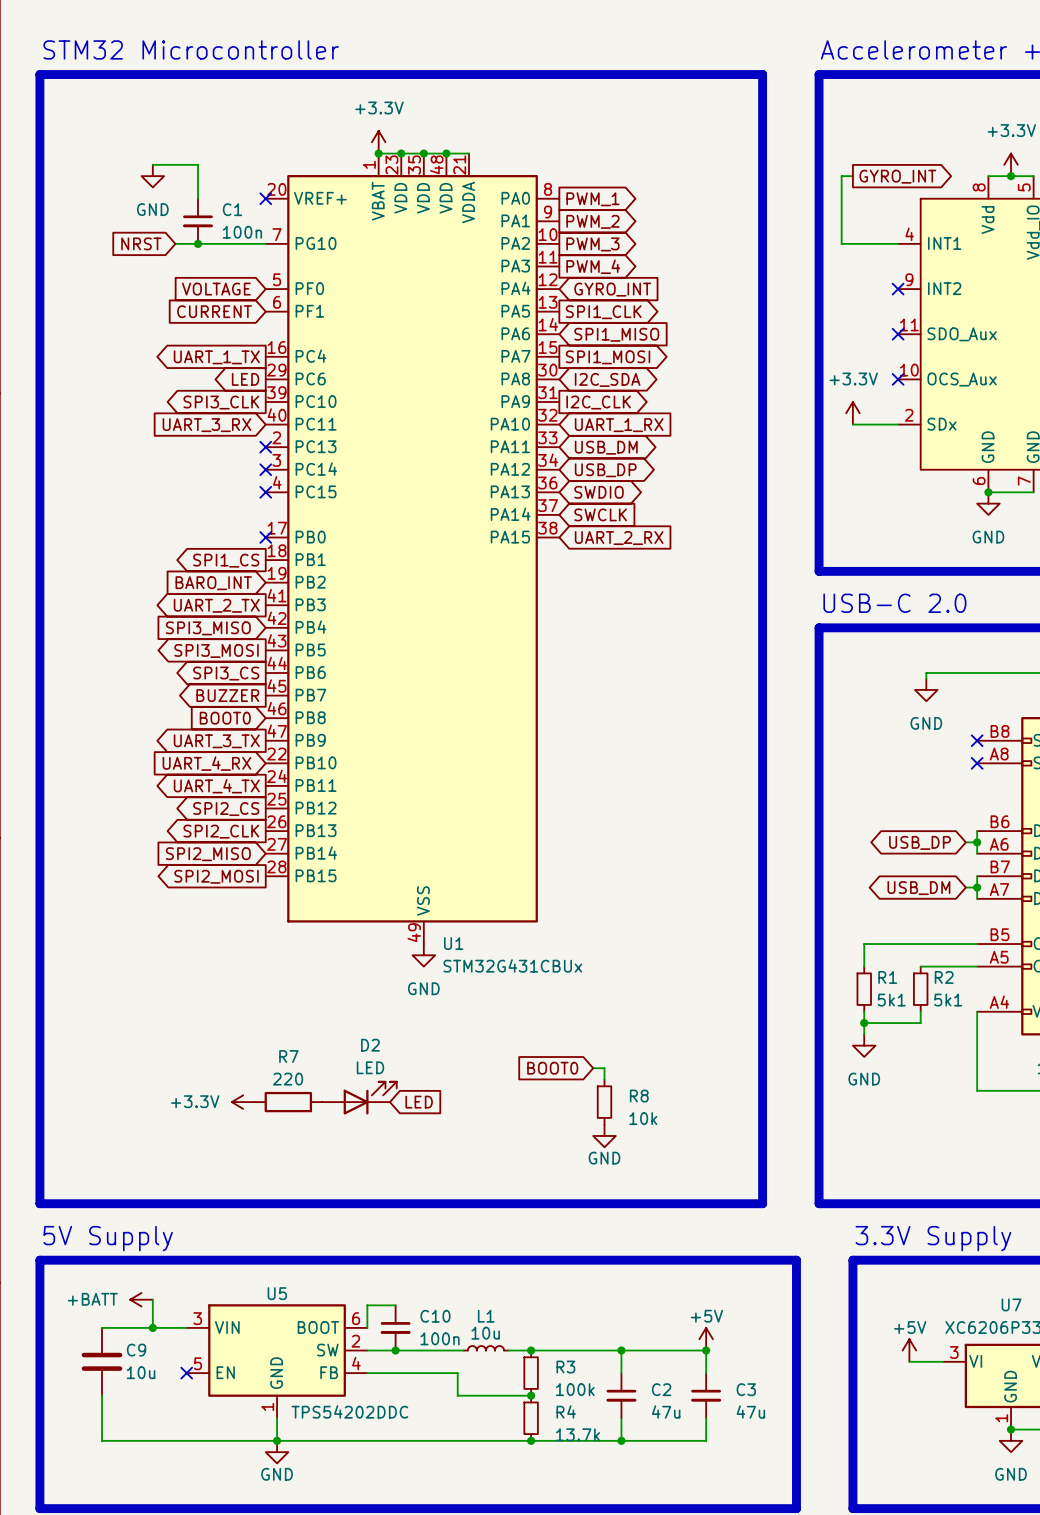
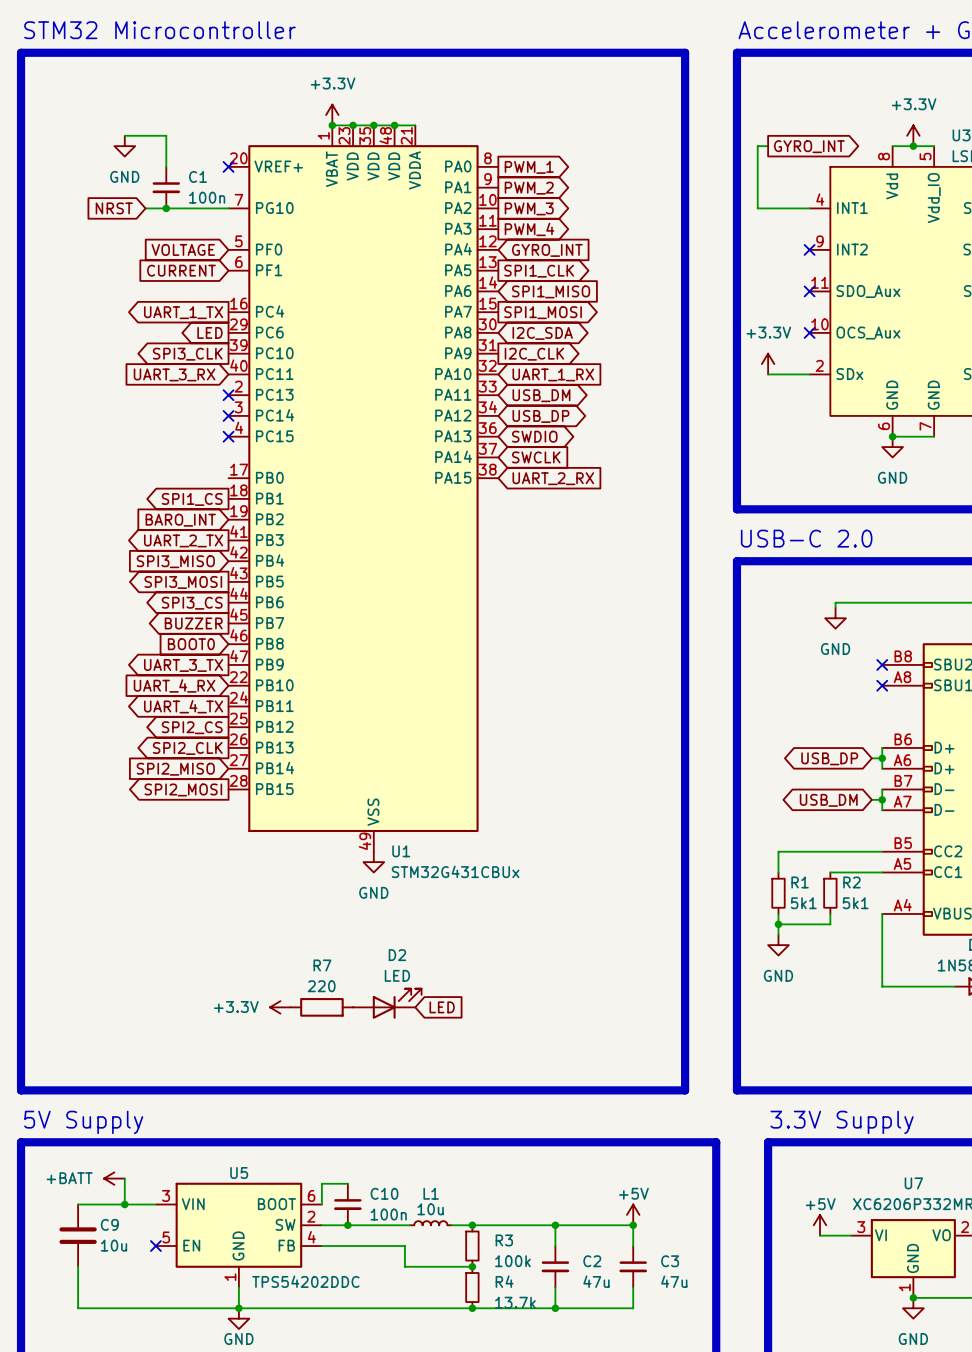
no-connect mark: (265, 537) -> none
global label: BOOT0 (552, 1068) -> none
wire: (593, 1068) (604, 1068) (604, 1079) -> none
D2 position: (359, 1098) -> (387, 1003)
power symbol position: +3.3V (243, 1102) -> +3.3V (280, 1007)
R7 position: (288, 1102) -> (321, 1007)
global label position: LED (419, 1102) -> LED (442, 1007)
R8: 10k (604, 1102) -> none
power symbol: GND (604, 1135) -> none

